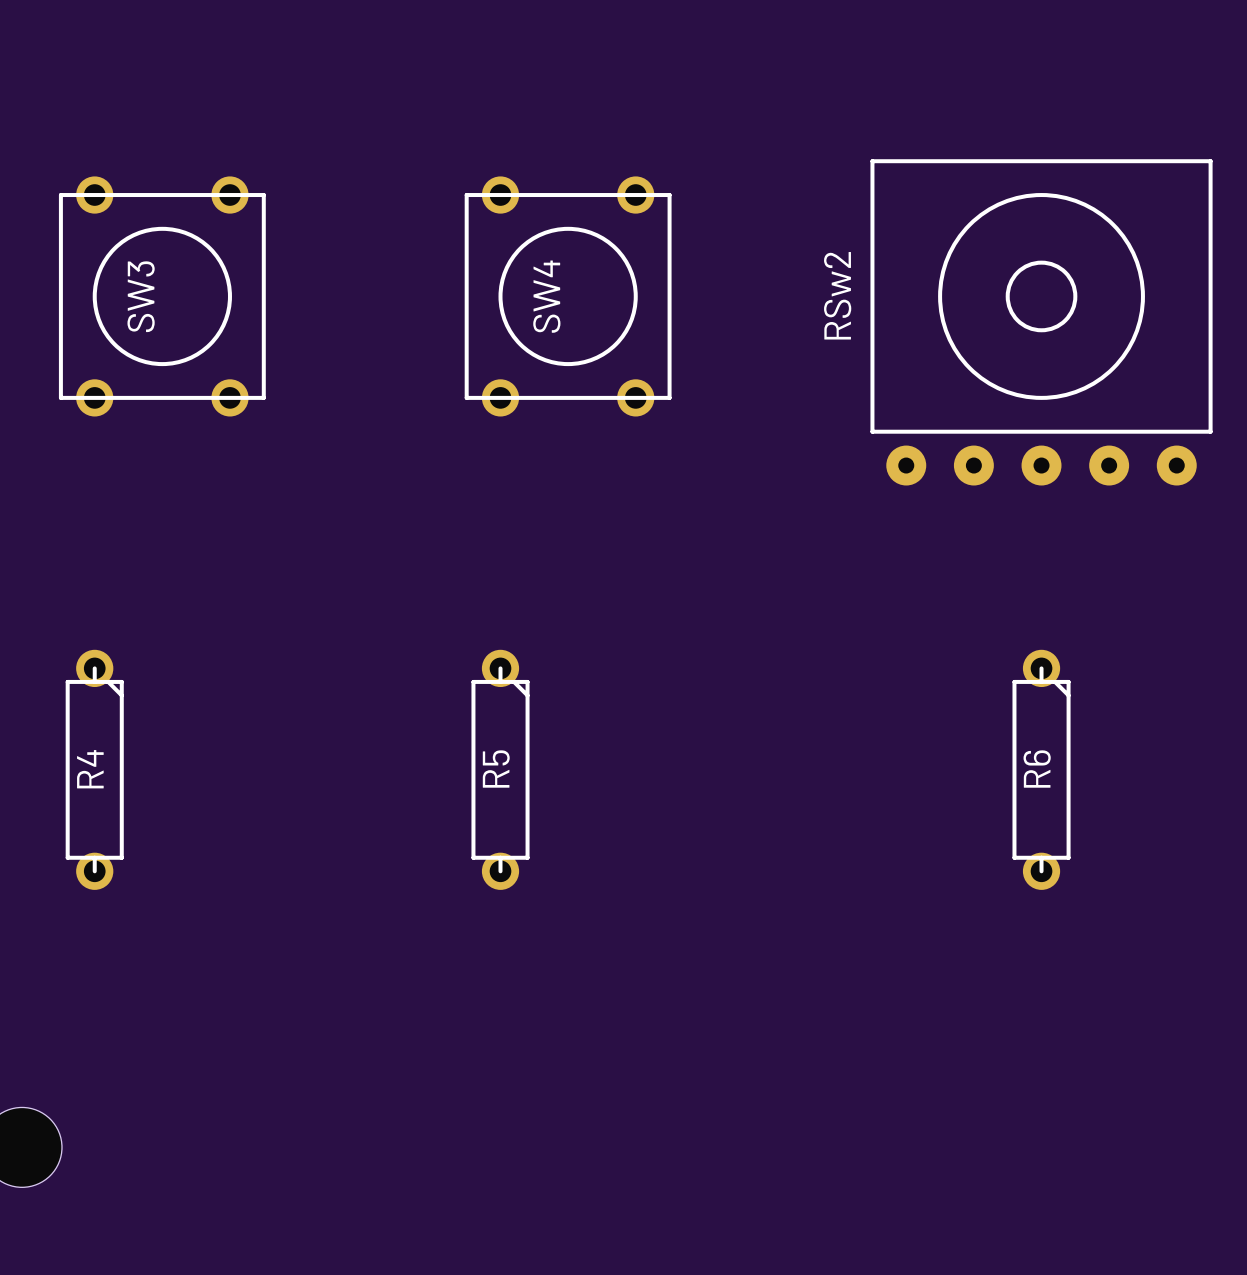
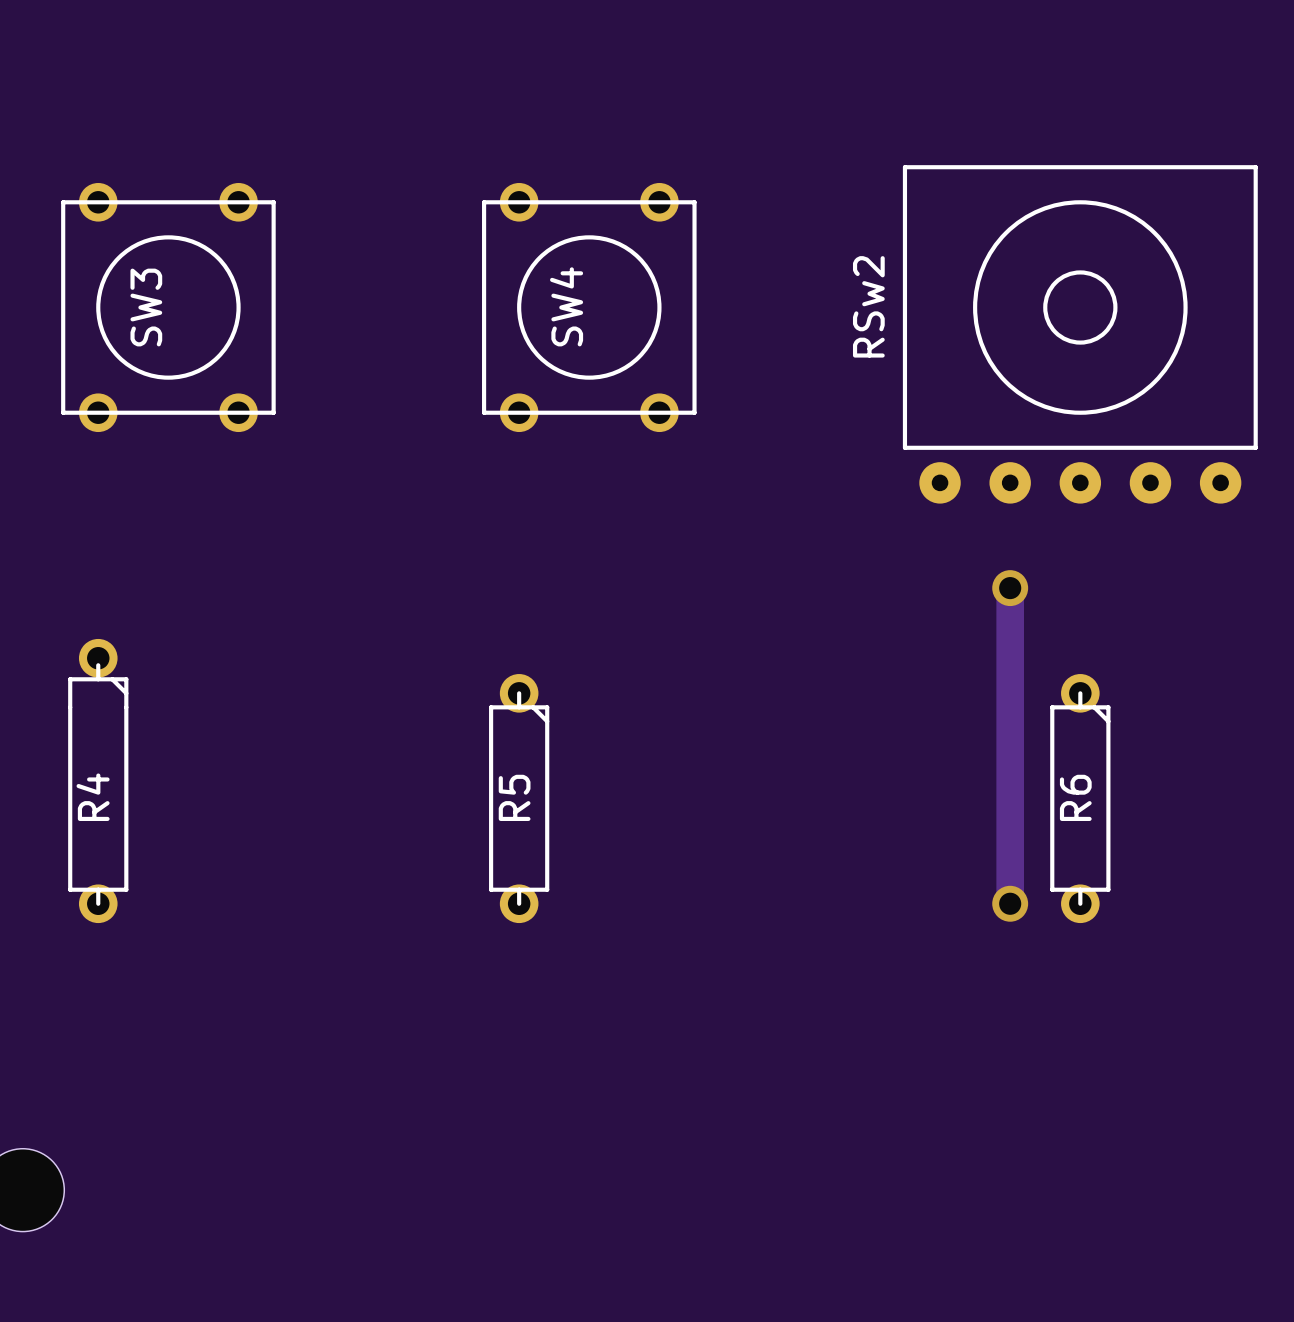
track: none -> (1010, 588) (1010, 903)
via: none -> (1010, 588)
R4 footprint: [65, 649, 124, 890] -> [68, 638, 129, 924]
via: none -> (1010, 903)

